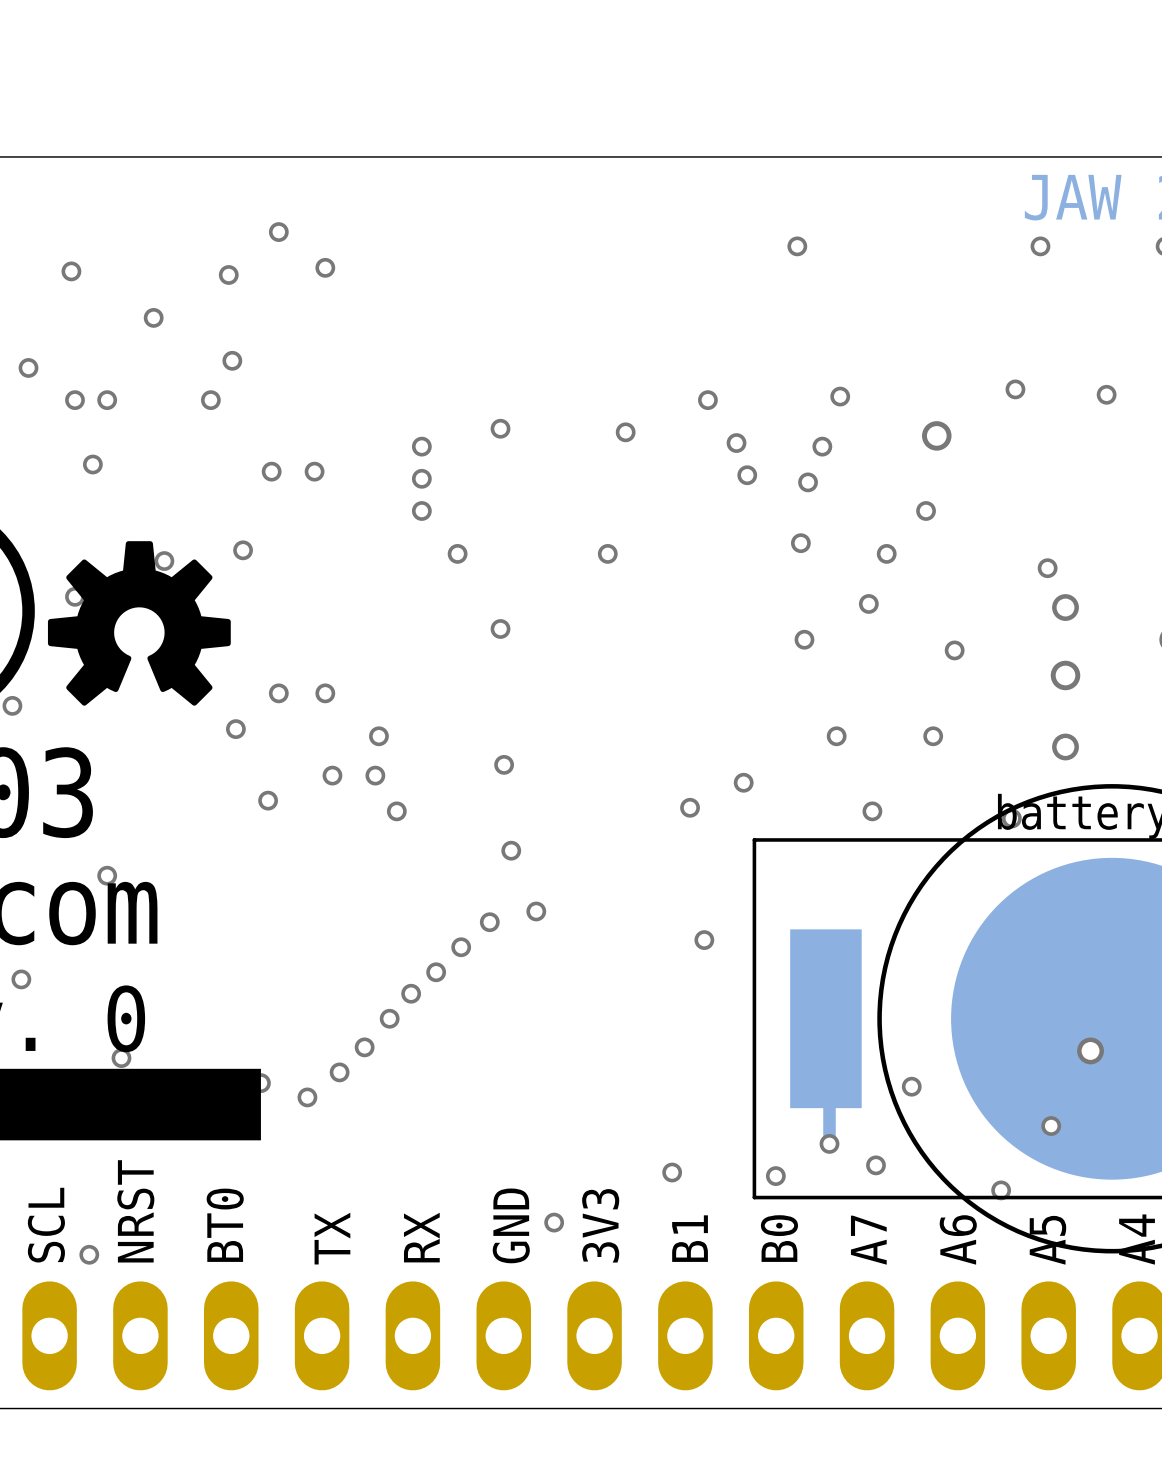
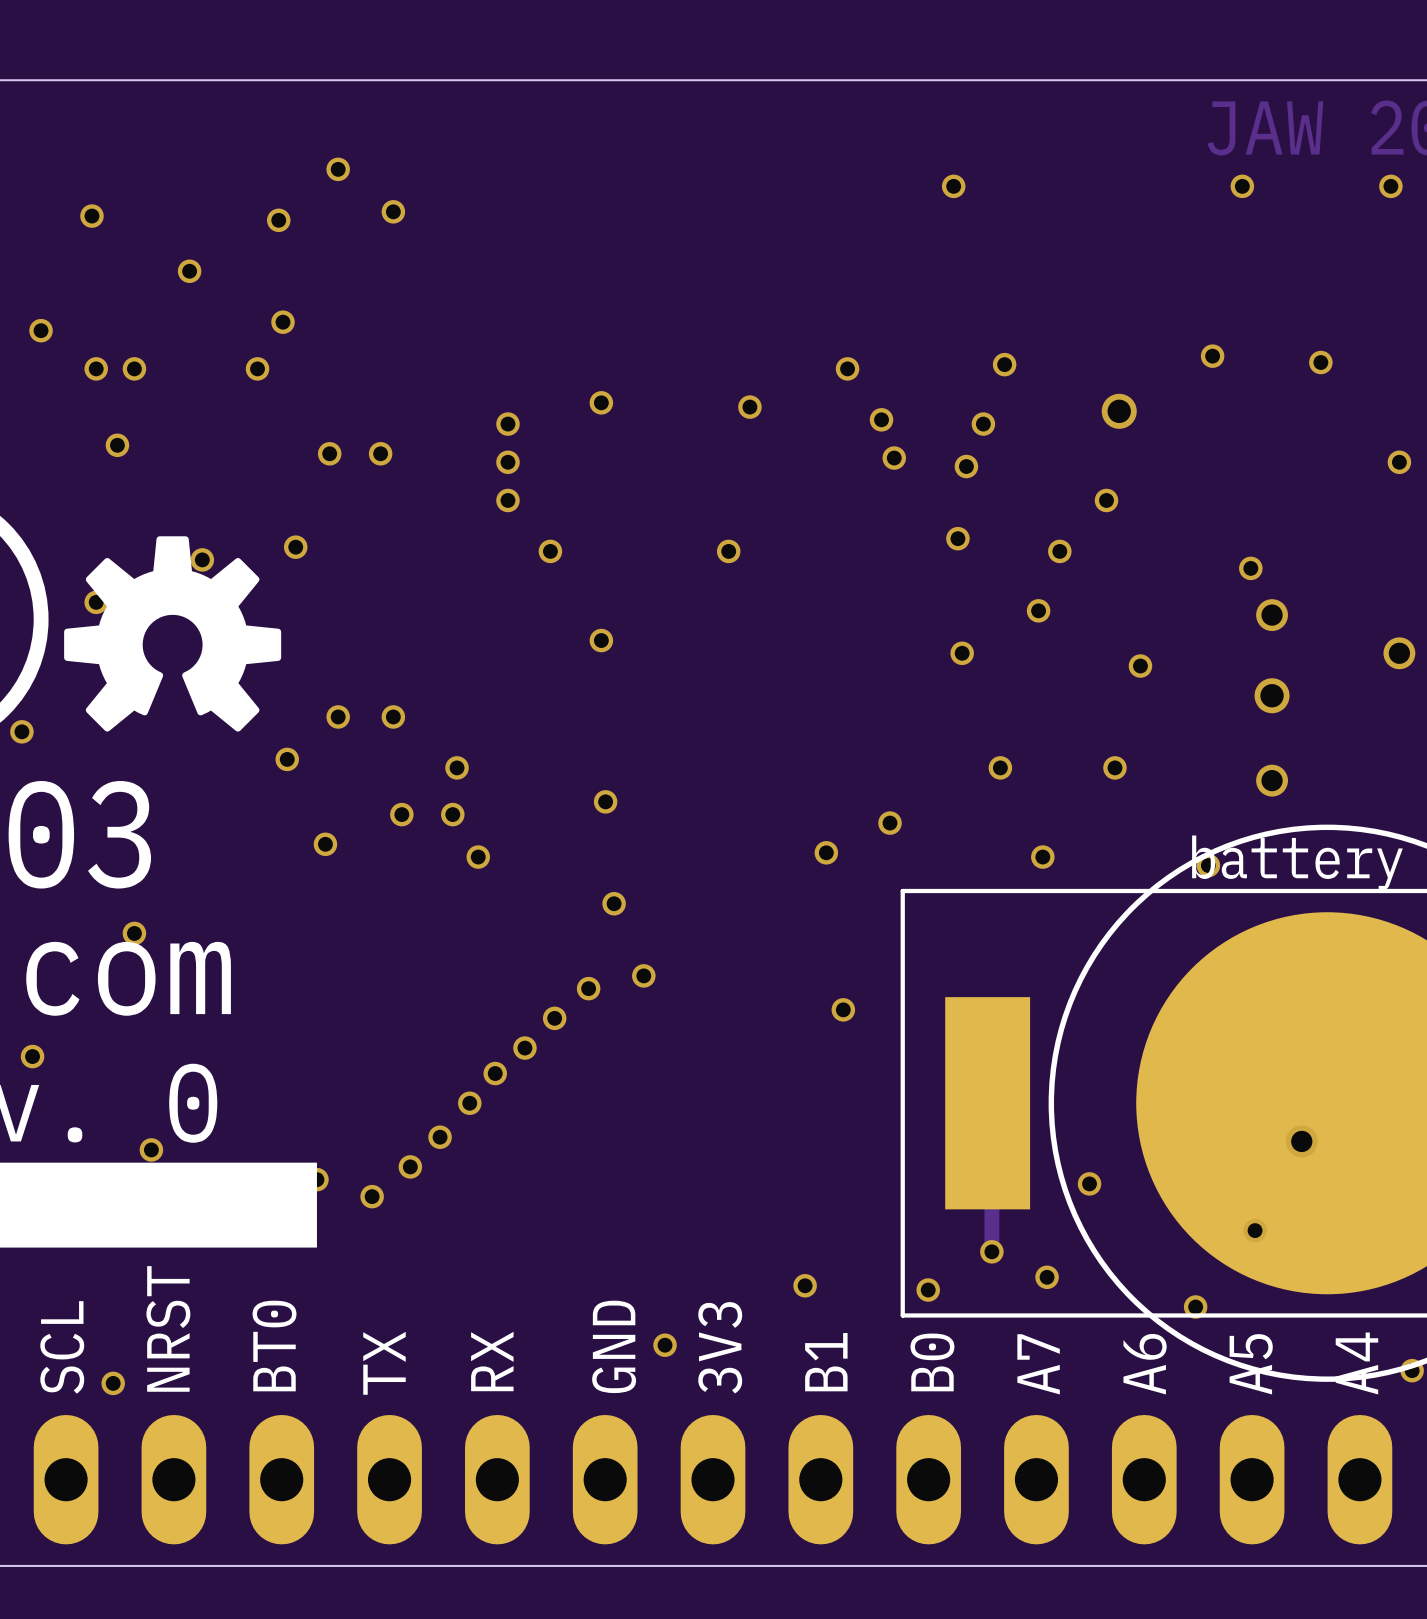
text position: RX (421, 1237) -> RX (492, 1361)
text position: TX (332, 1238) -> TX (384, 1363)

